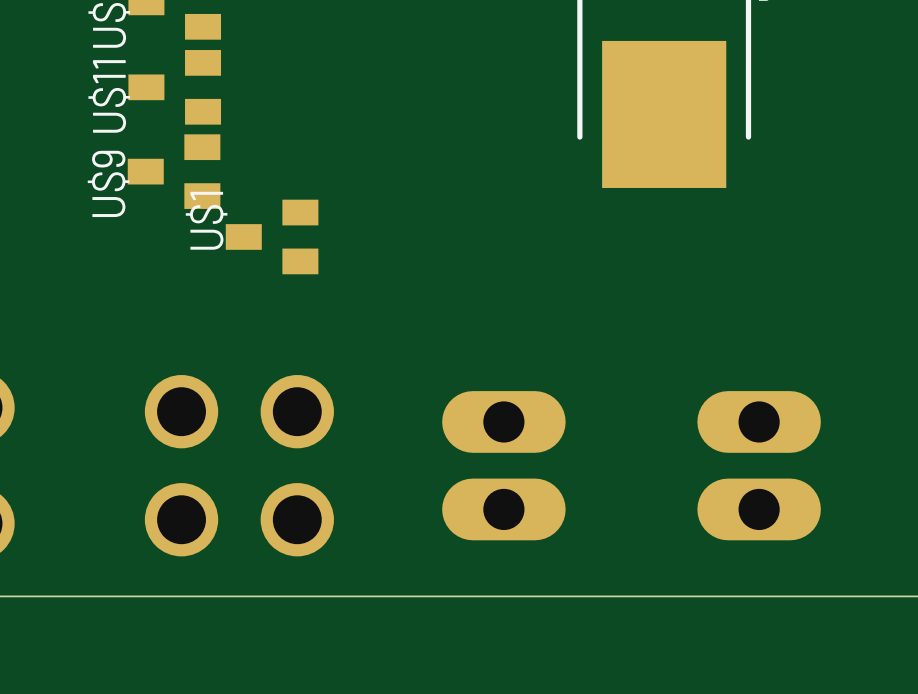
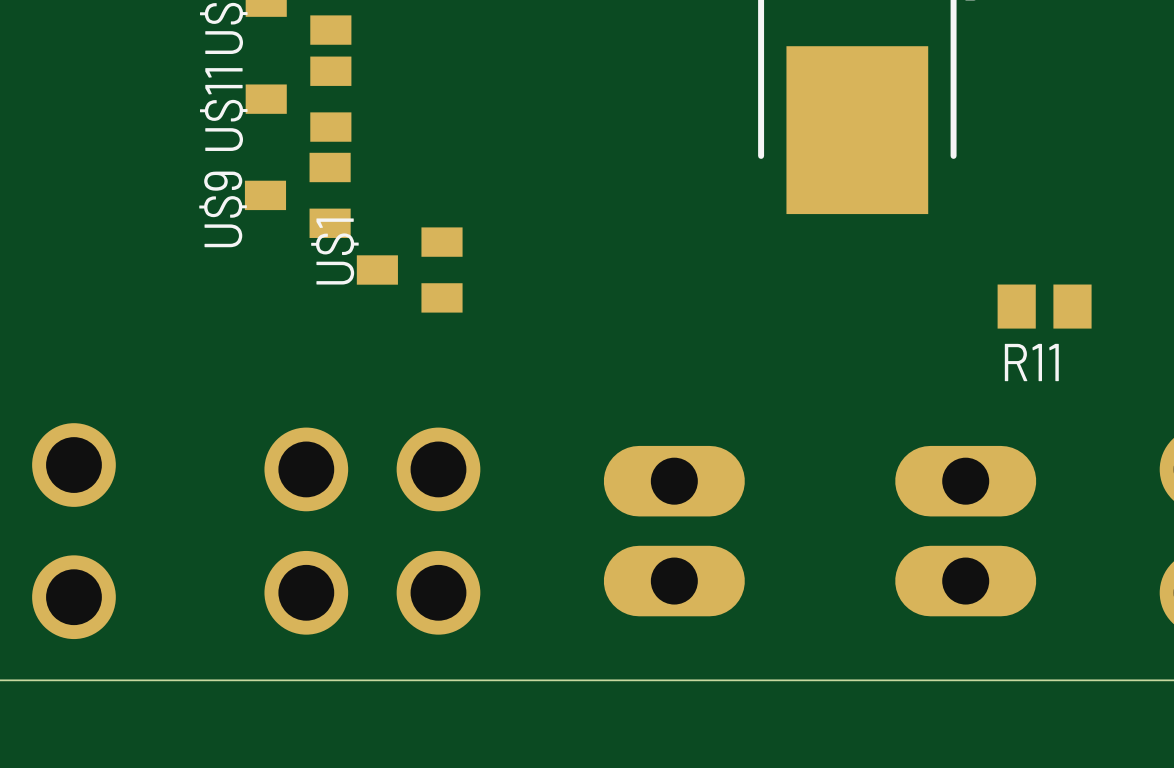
R11: none -> (1044, 306)

